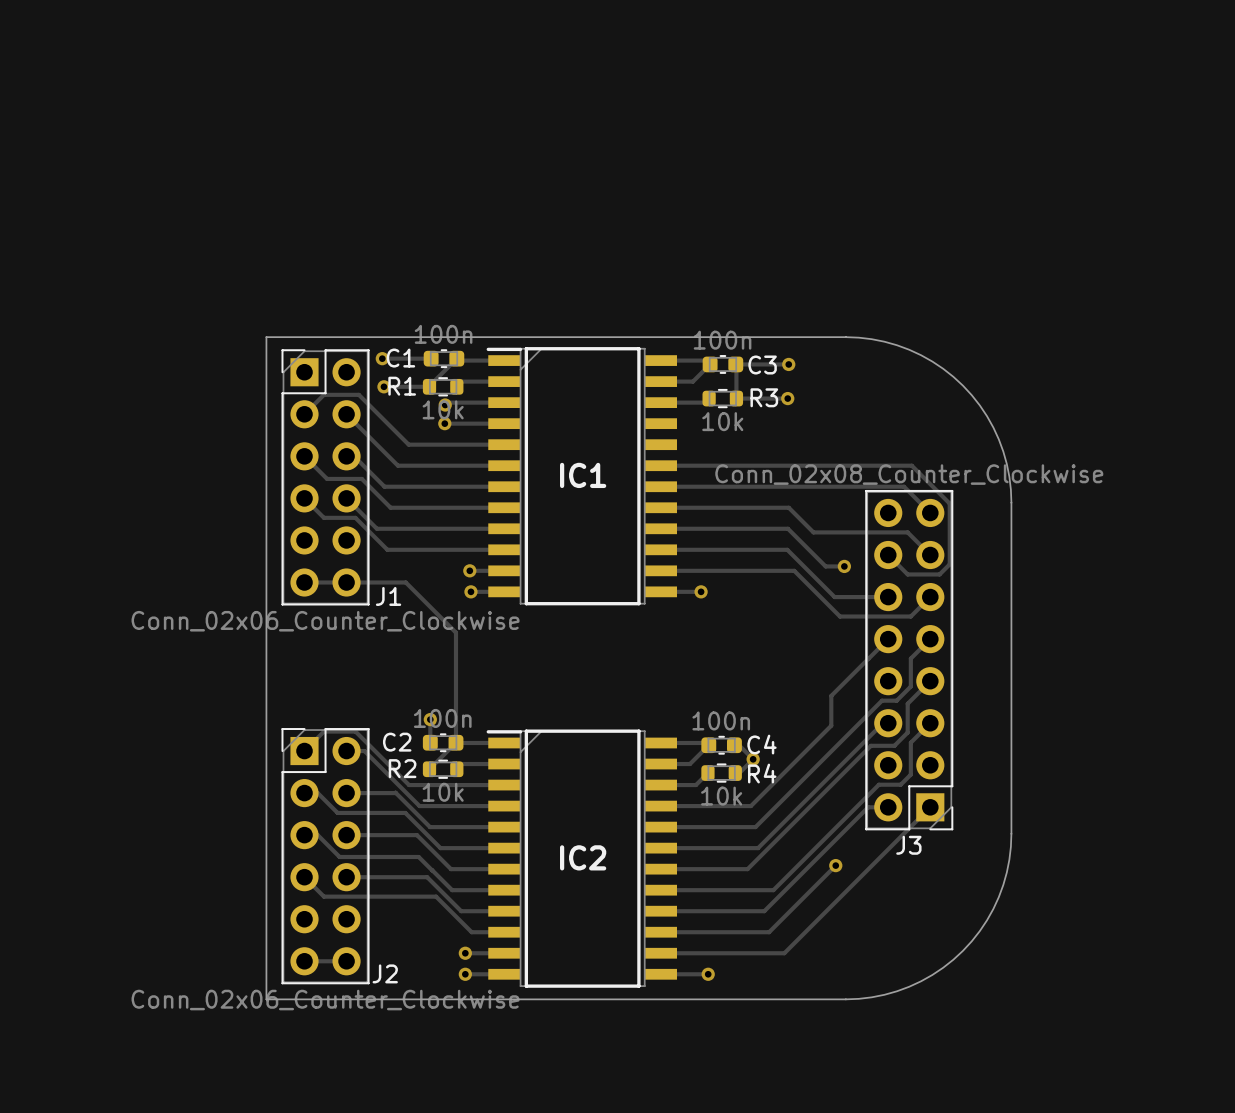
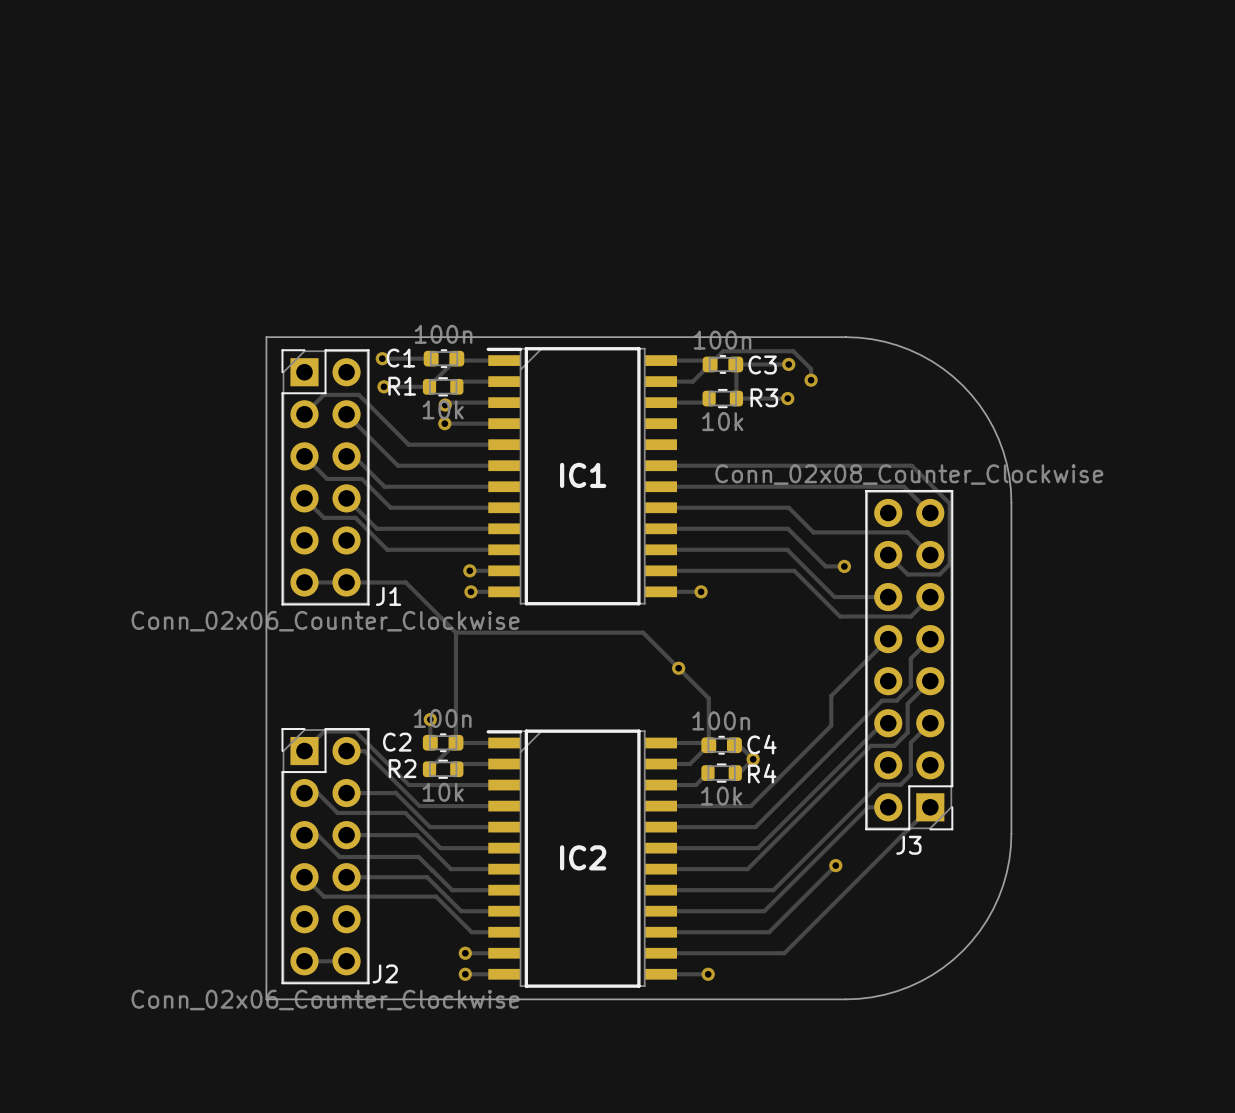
track: none -> (710, 370) (710, 364) (723, 351) (793, 351) (811, 369) (811, 380)
via: none -> (811, 380)
track: none -> (455, 632) (643, 632) (708, 698) (708, 745)
via: none -> (678, 668)

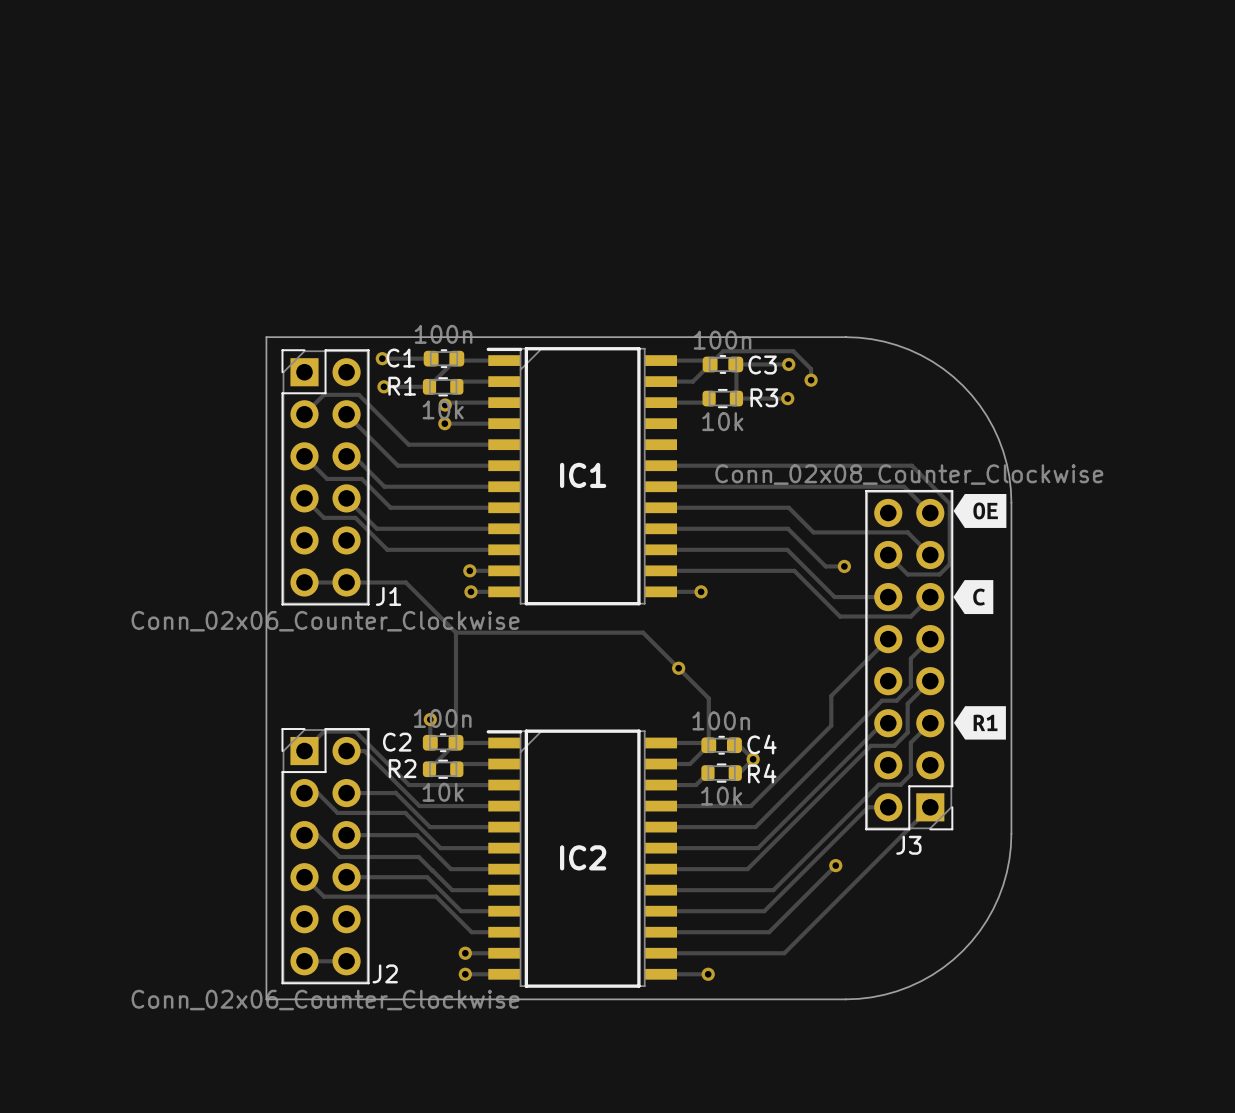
drawing: none -> [953, 494, 1007, 528]
drawing: none -> [953, 580, 994, 615]
drawing: none -> [954, 706, 1006, 740]

